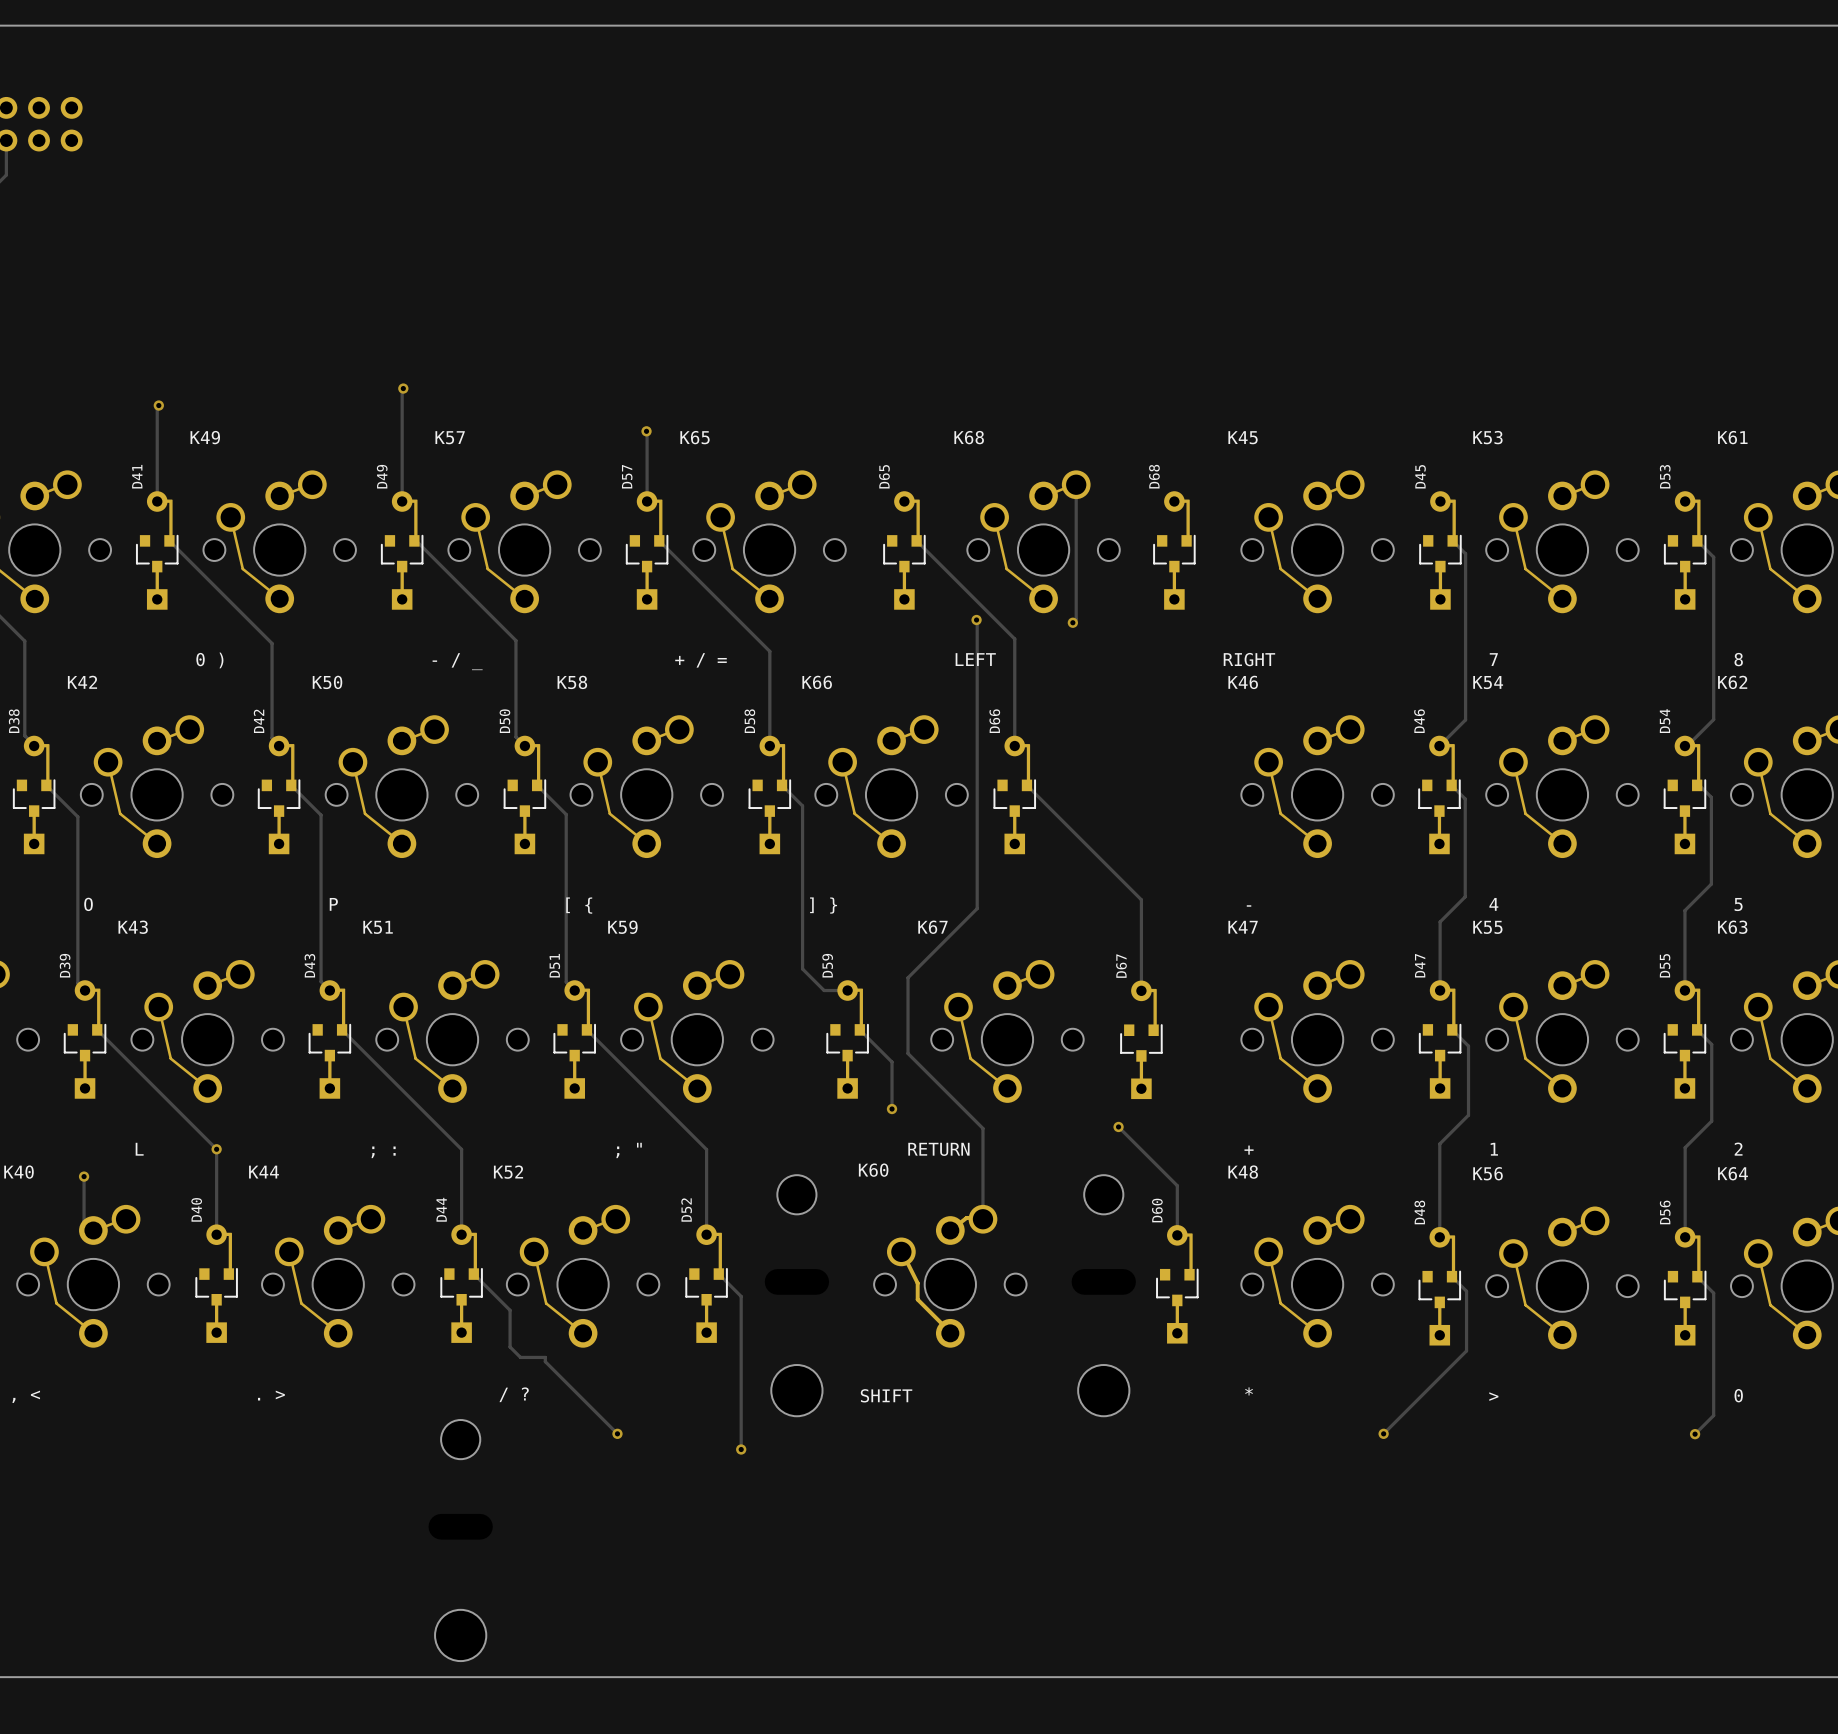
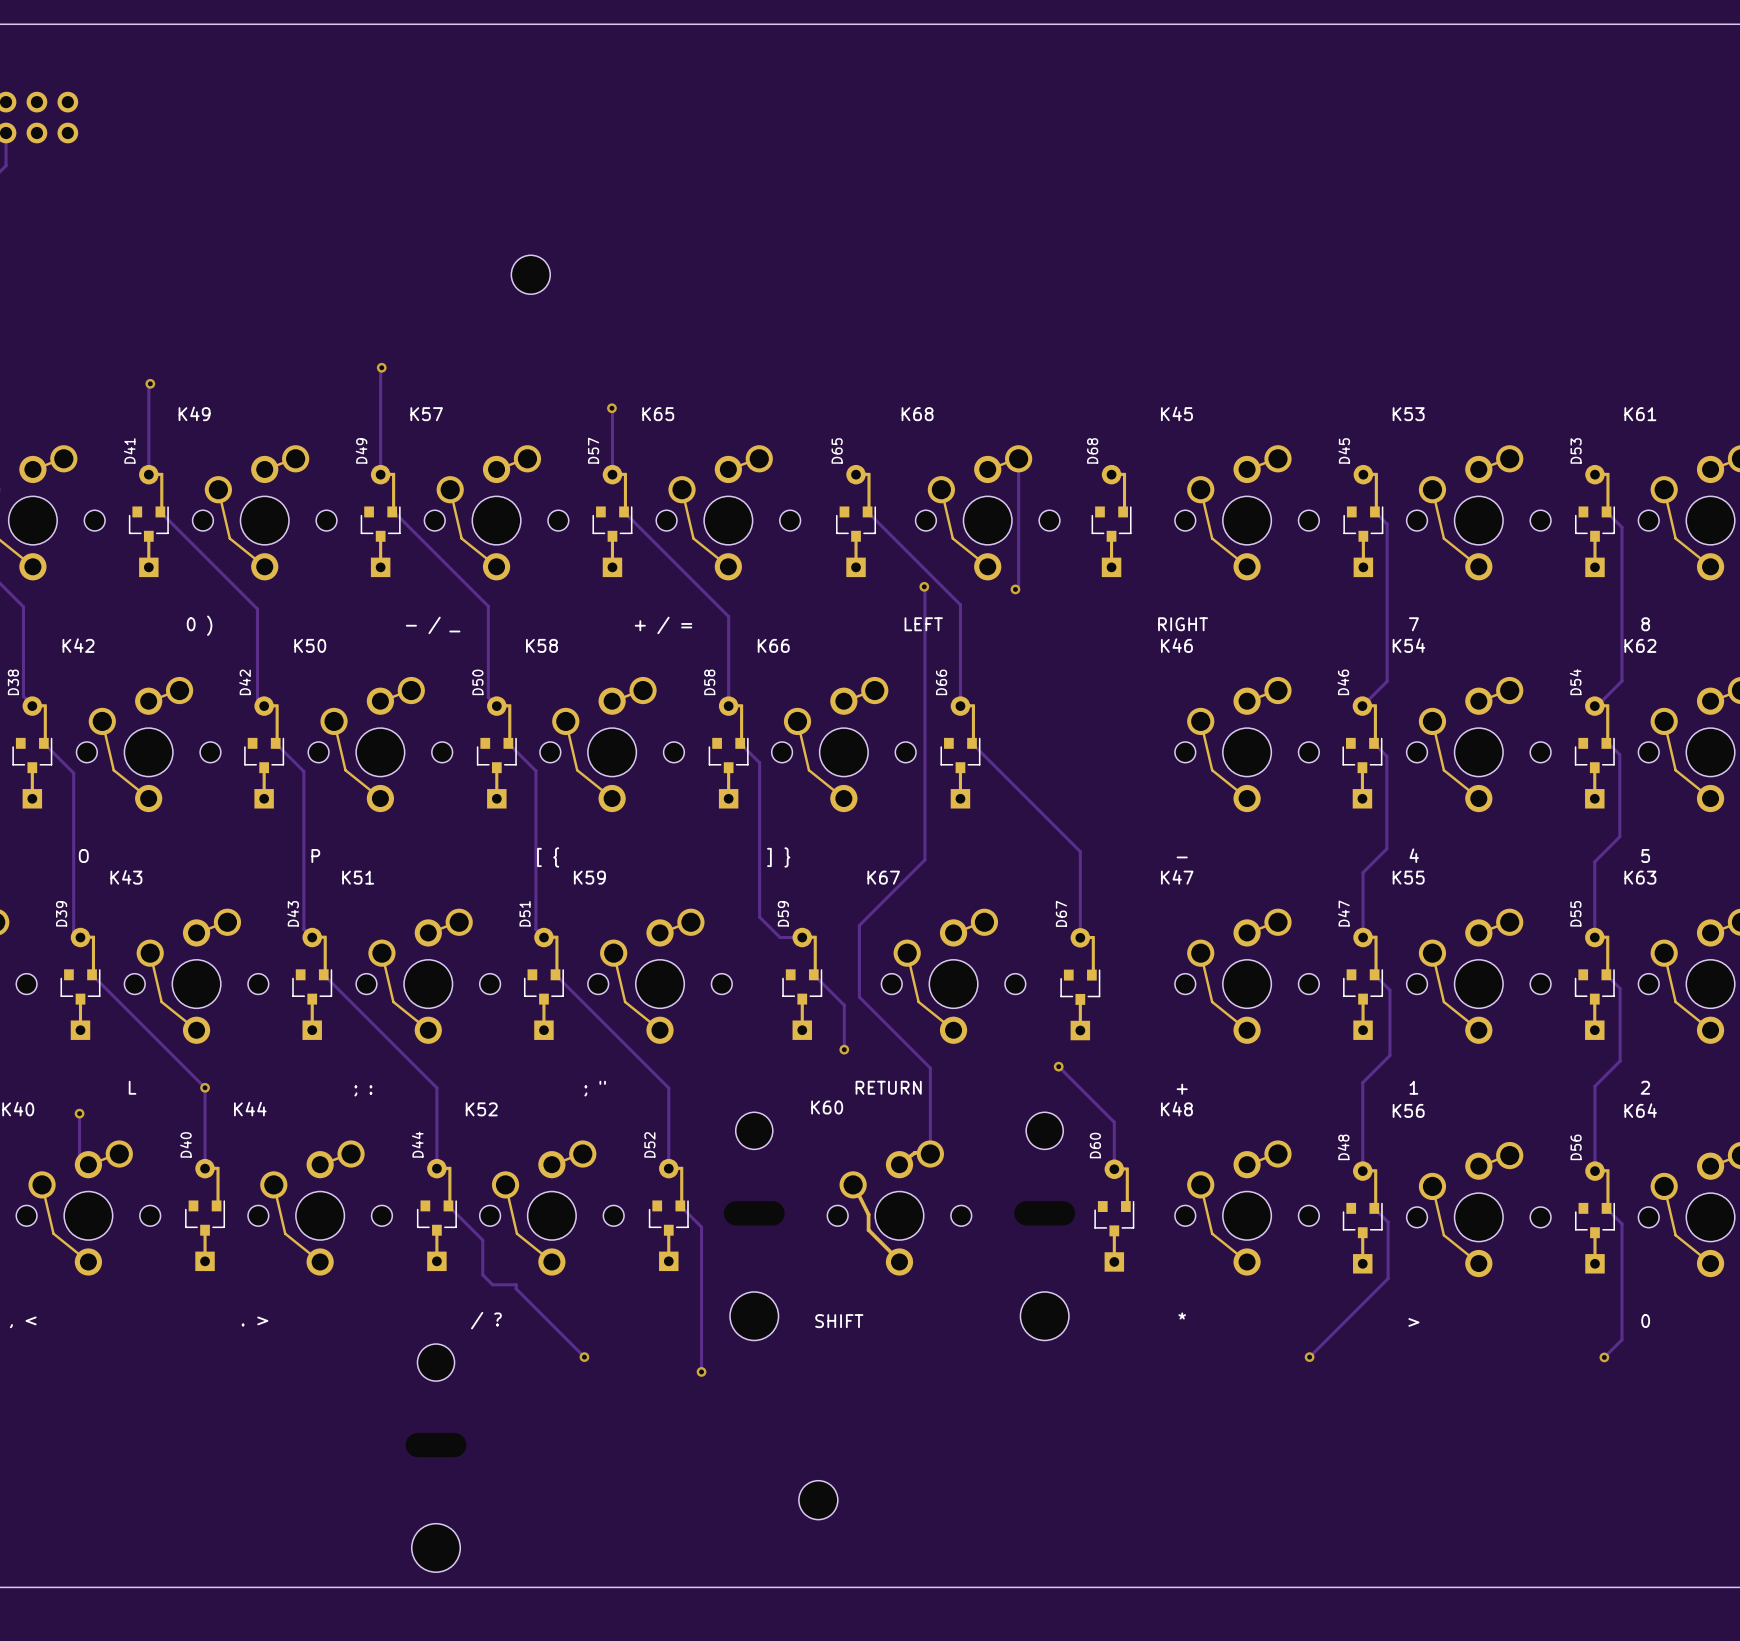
part: none -> (530, 274)
part: none -> (818, 1500)

